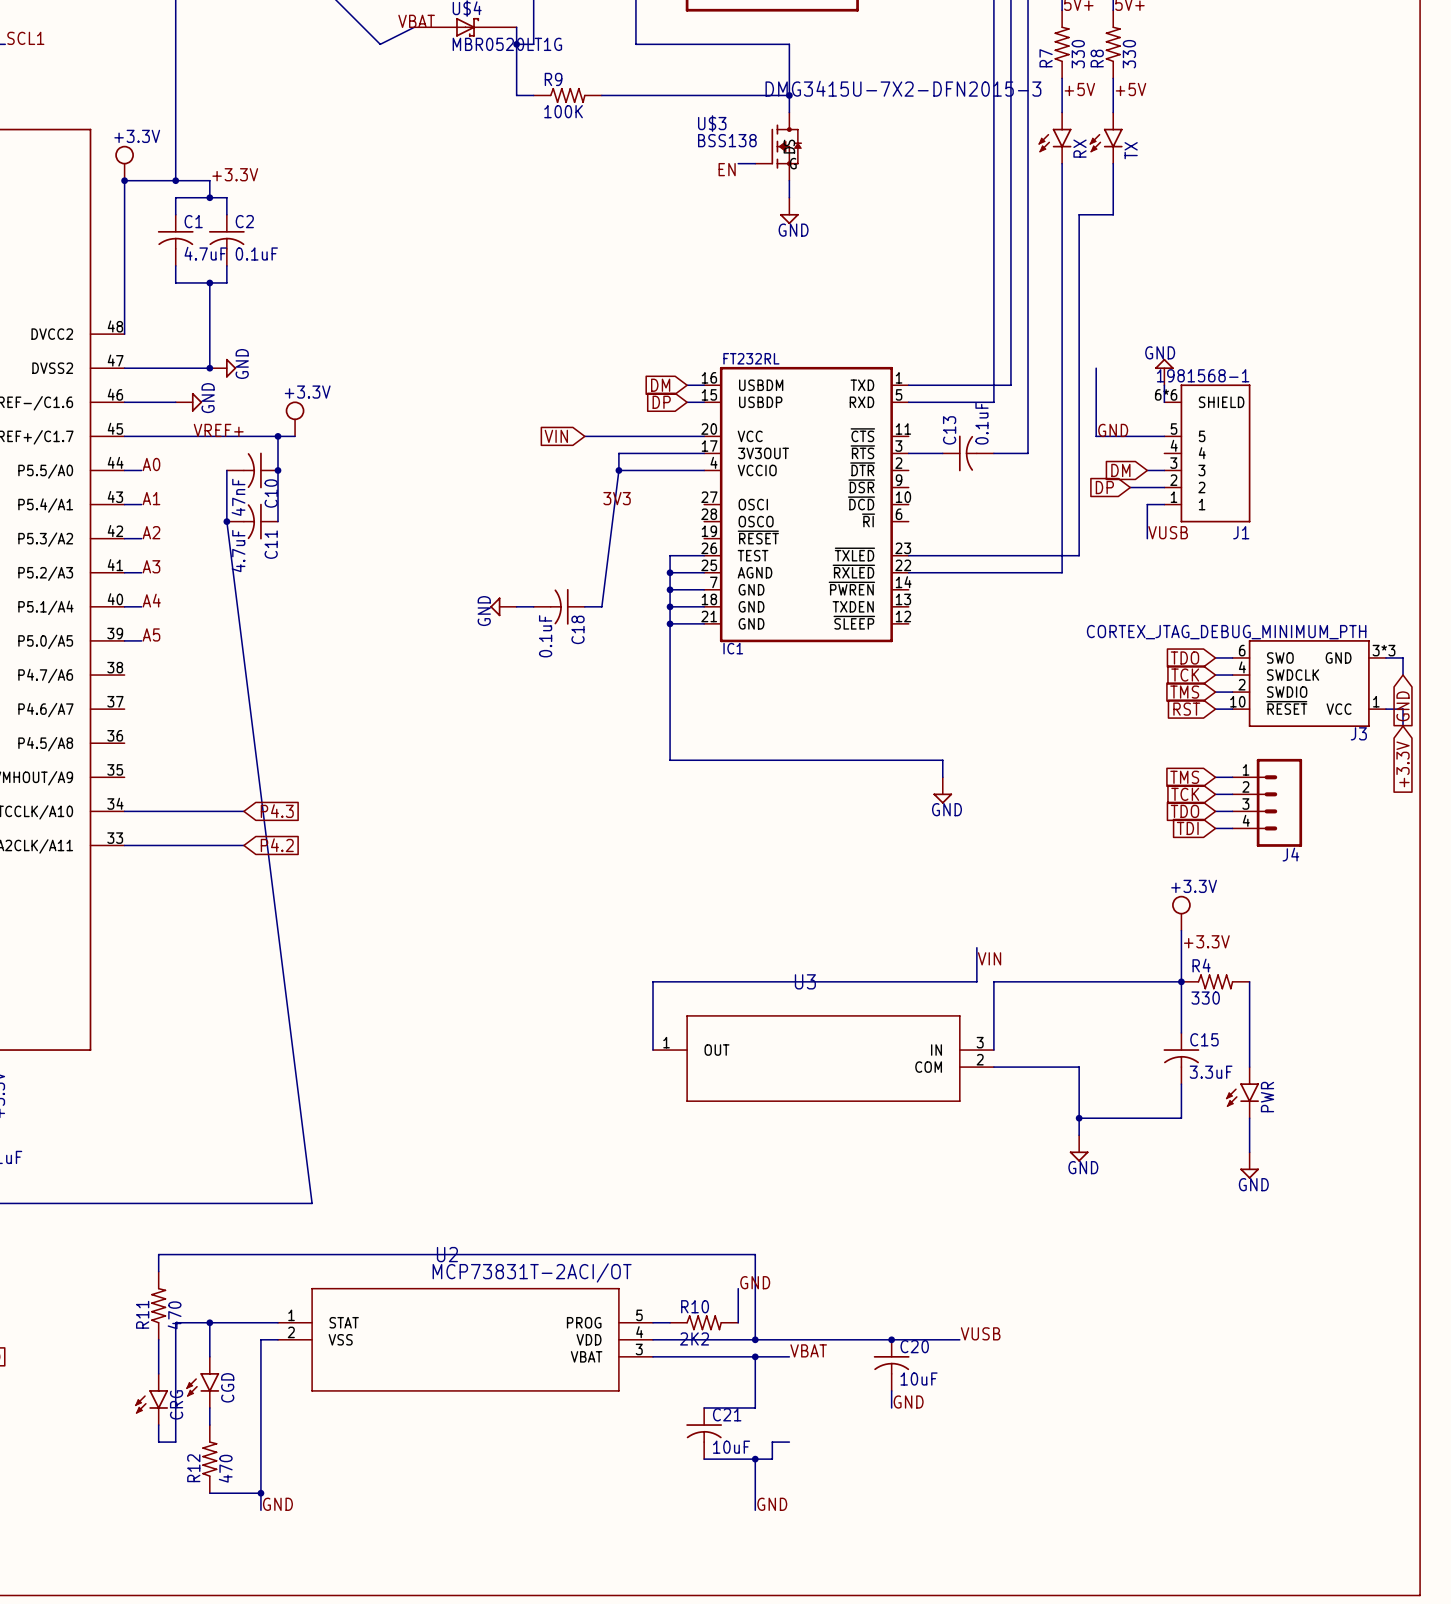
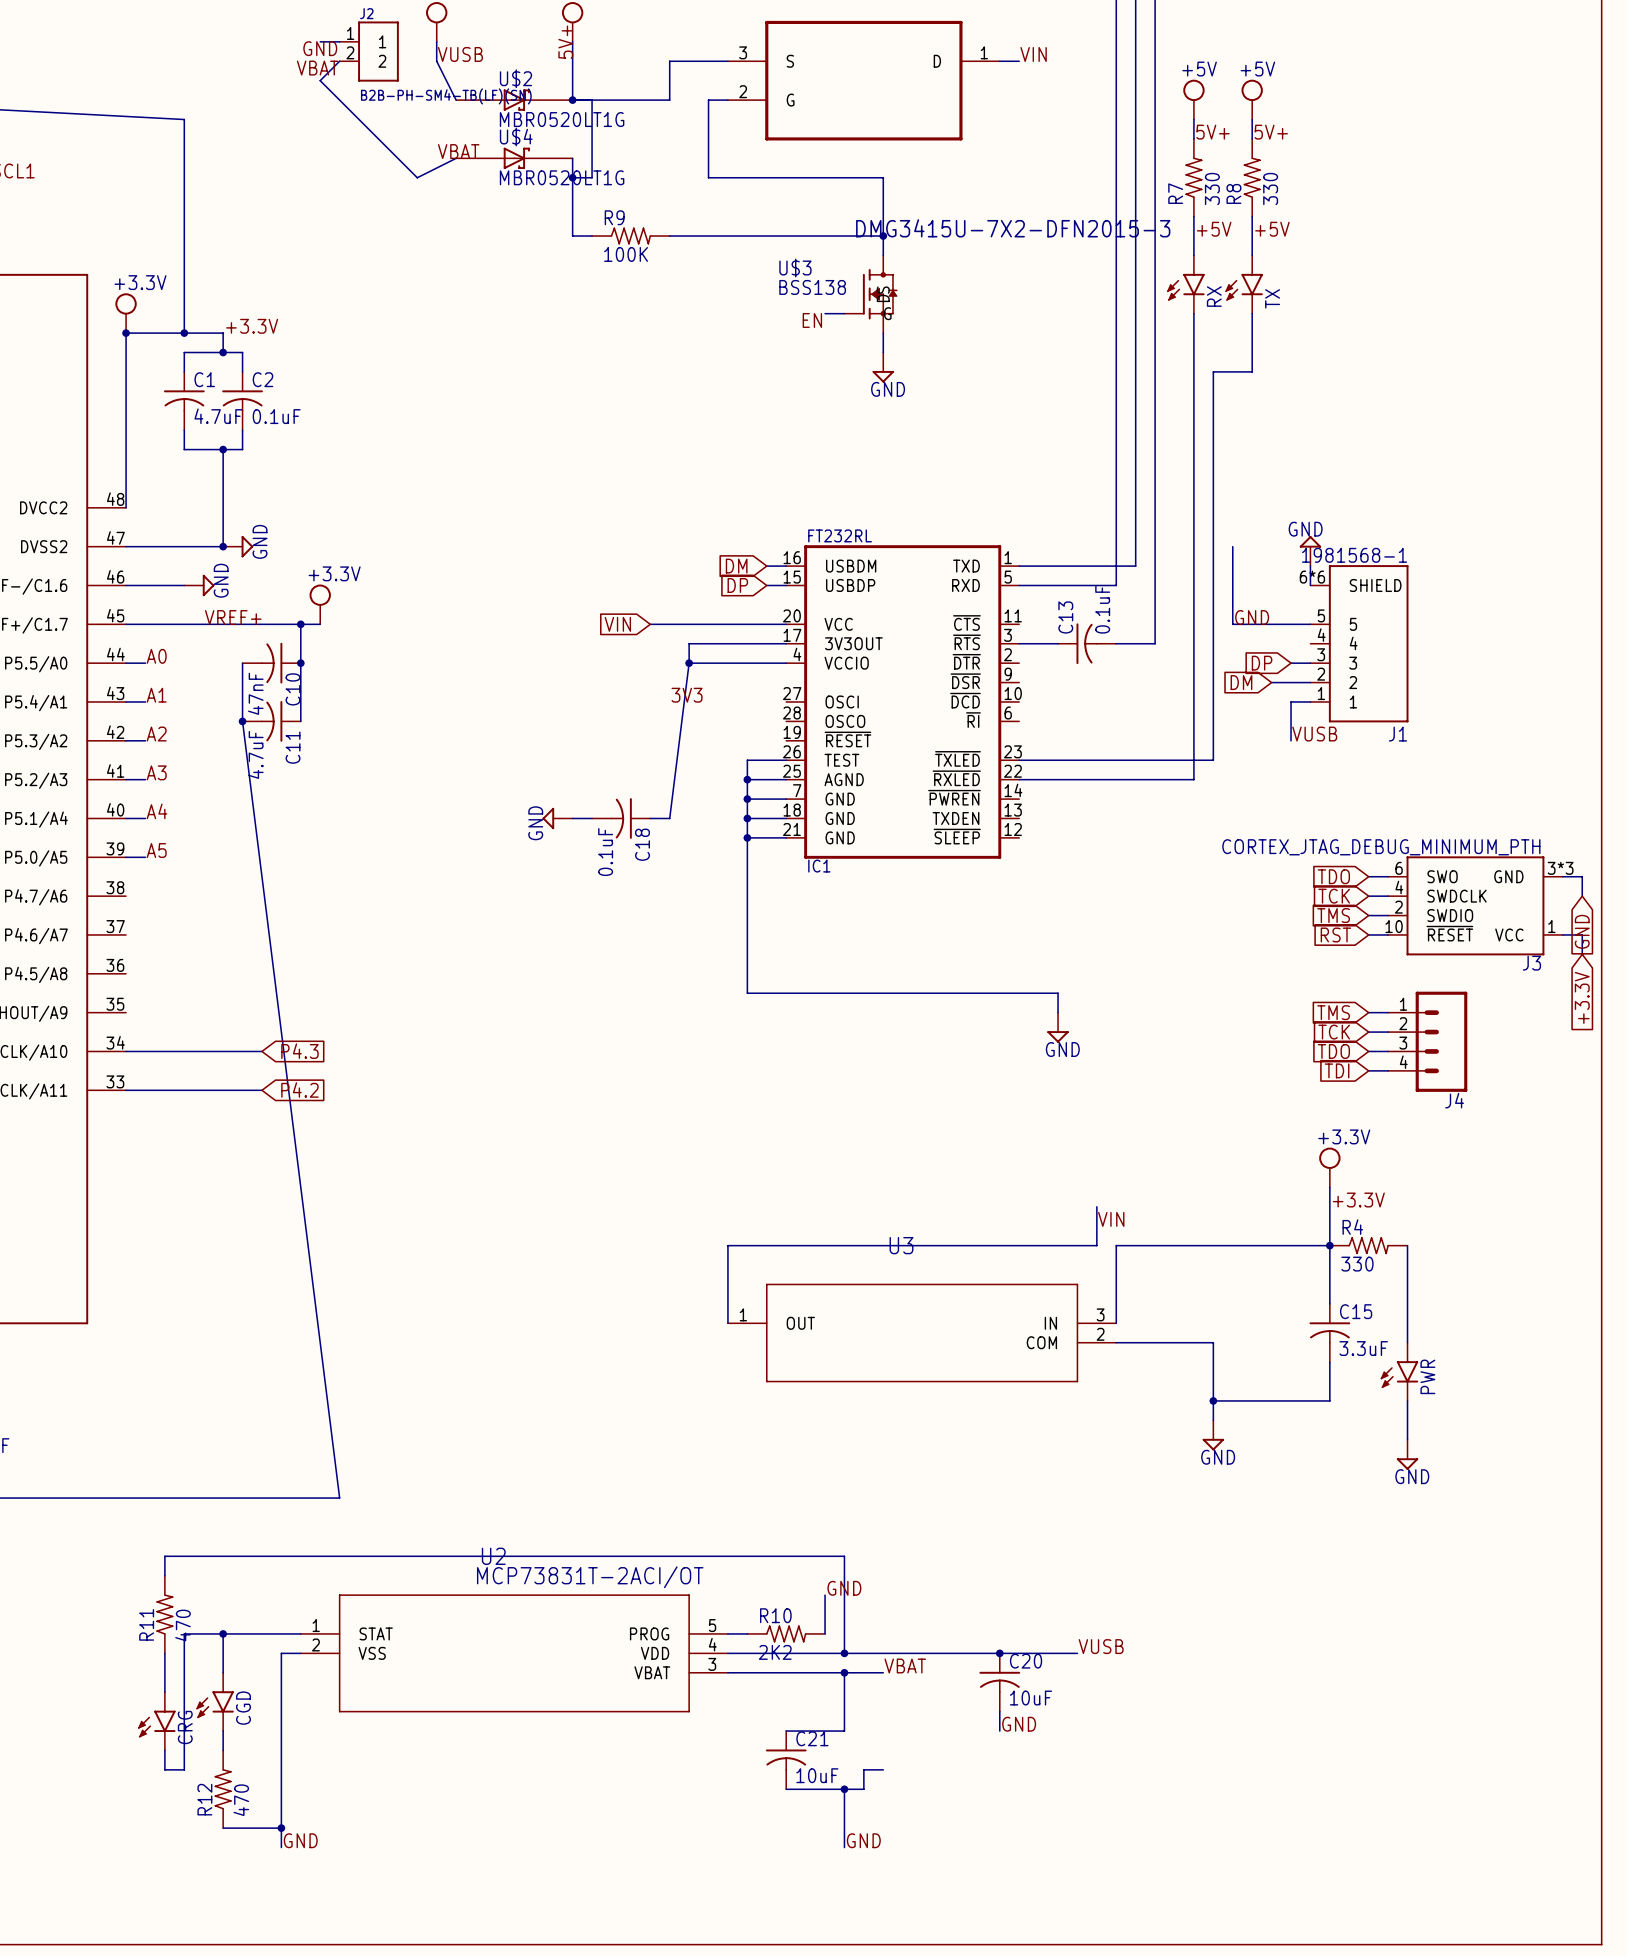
global label: DM (1120, 470) -> DP (1262, 663)
global label: DP (1104, 487) -> DM (1241, 682)

